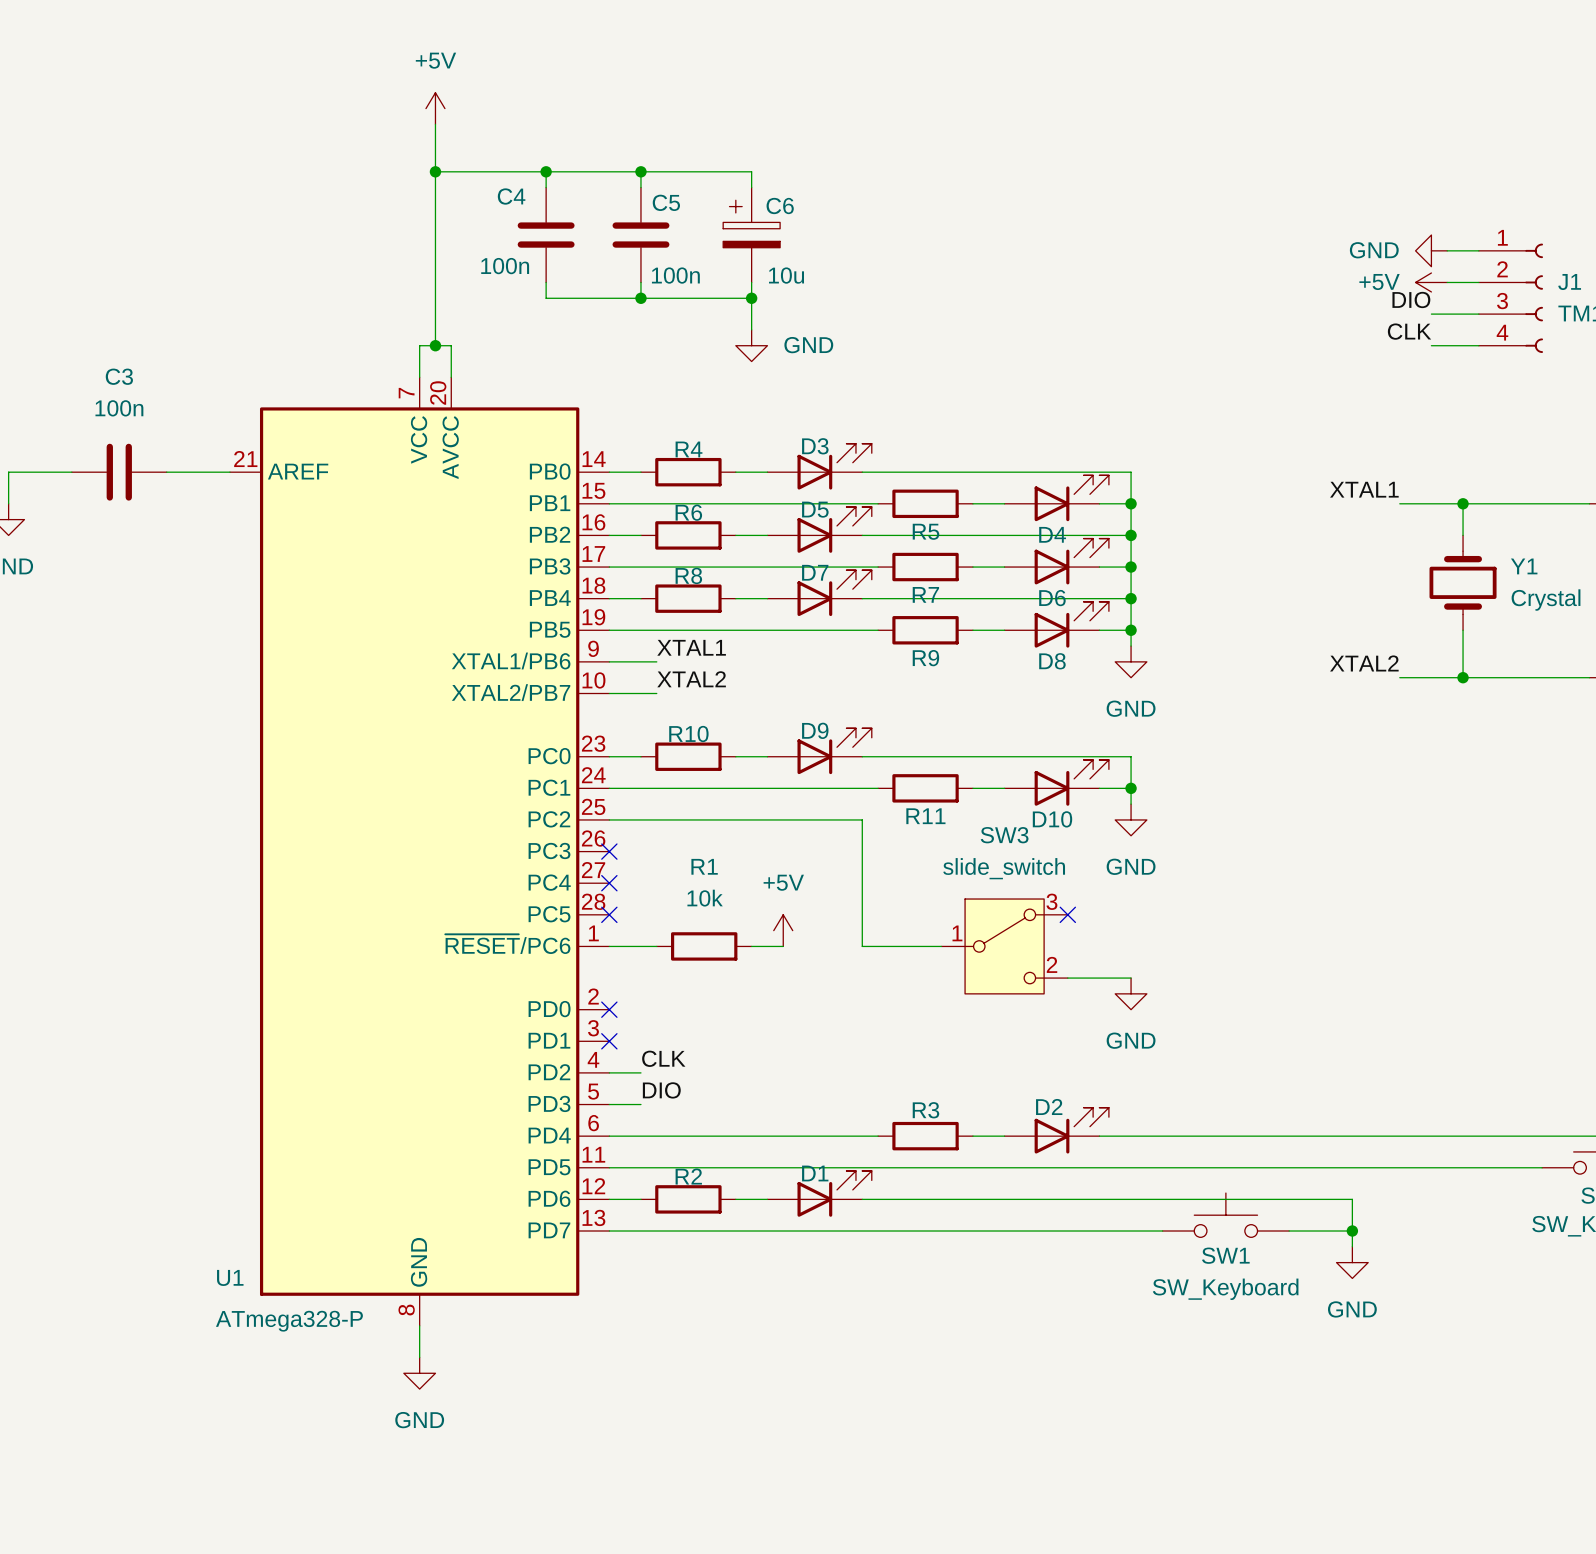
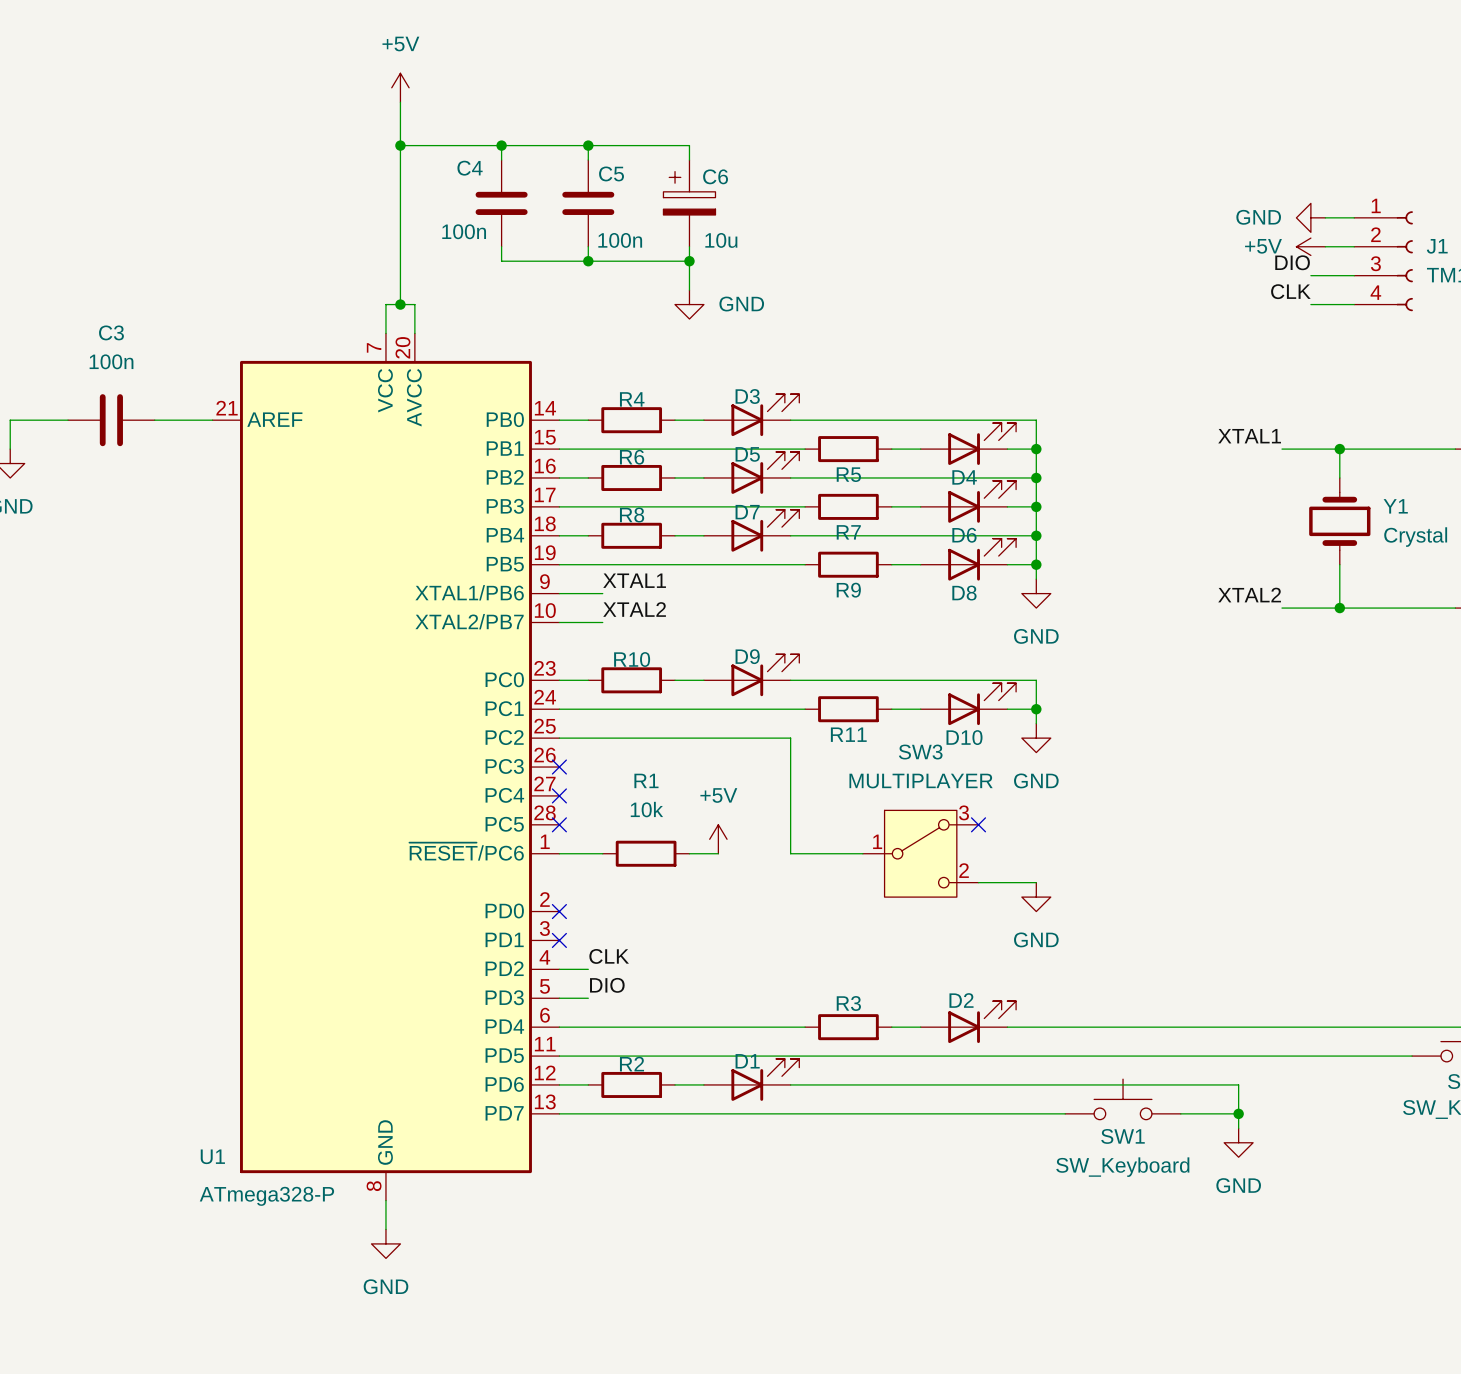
SW3 value: slide_switch (1004, 868) -> MULTIPLAYER (921, 781)

